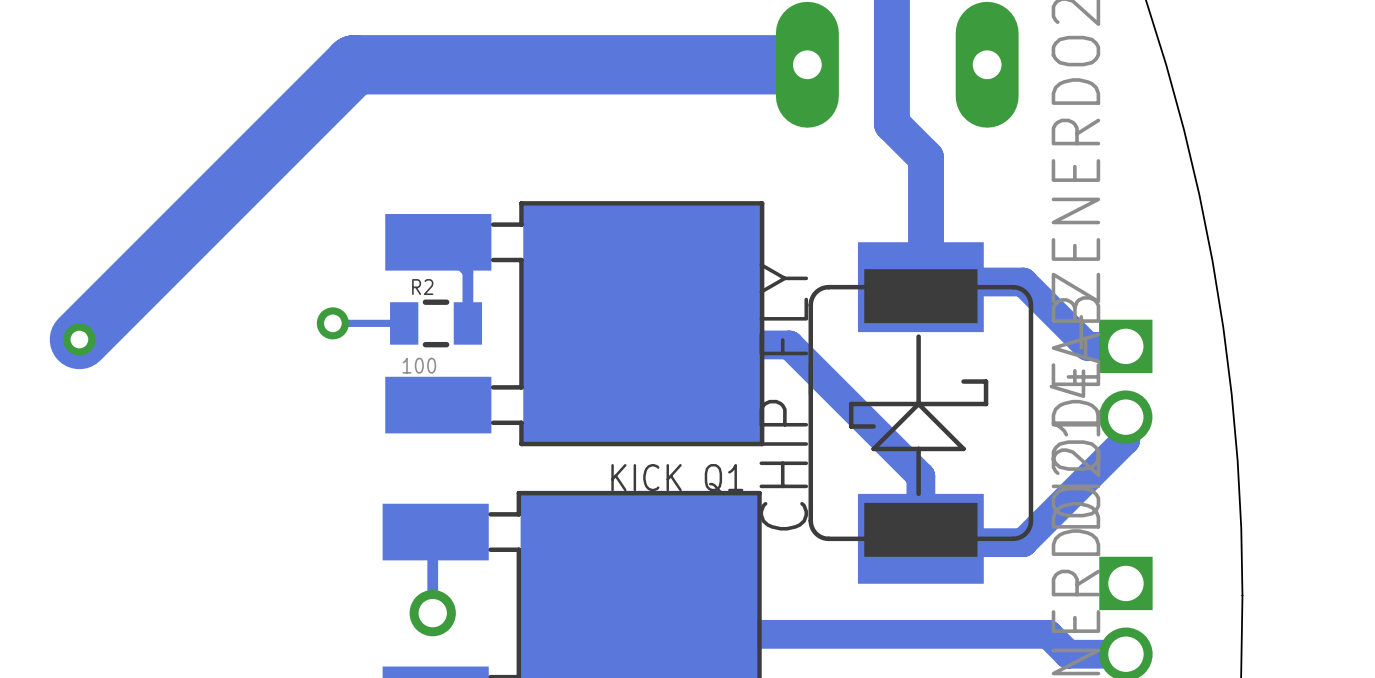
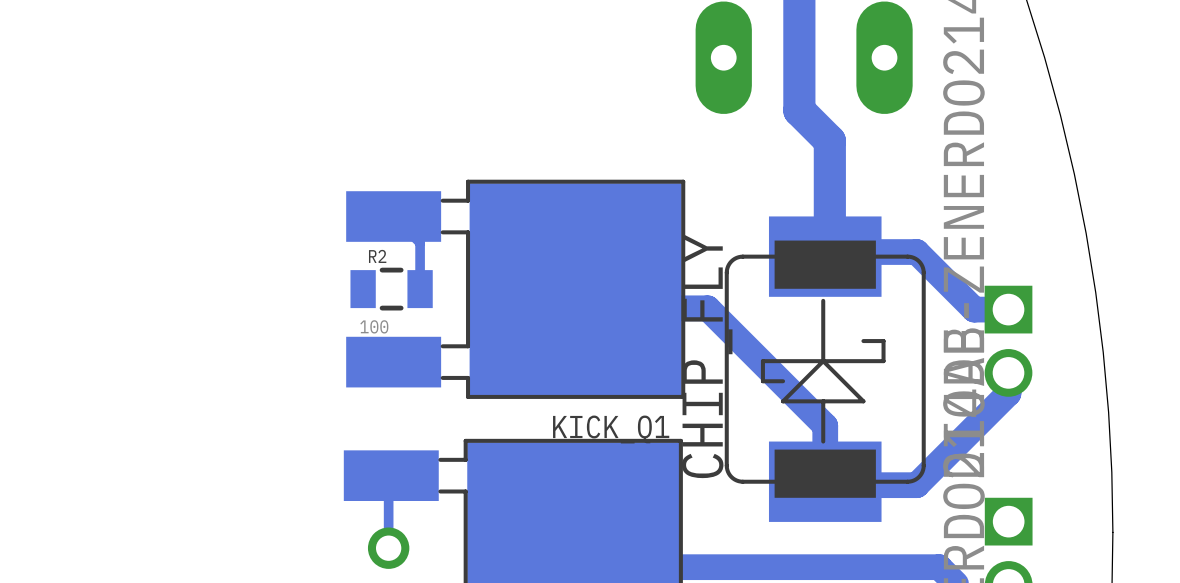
track: (807, 64) (354, 64) (79, 339) -> none
via: (332, 323) -> none
track: (404, 323) (332, 323) -> none
via: (79, 339) -> none

